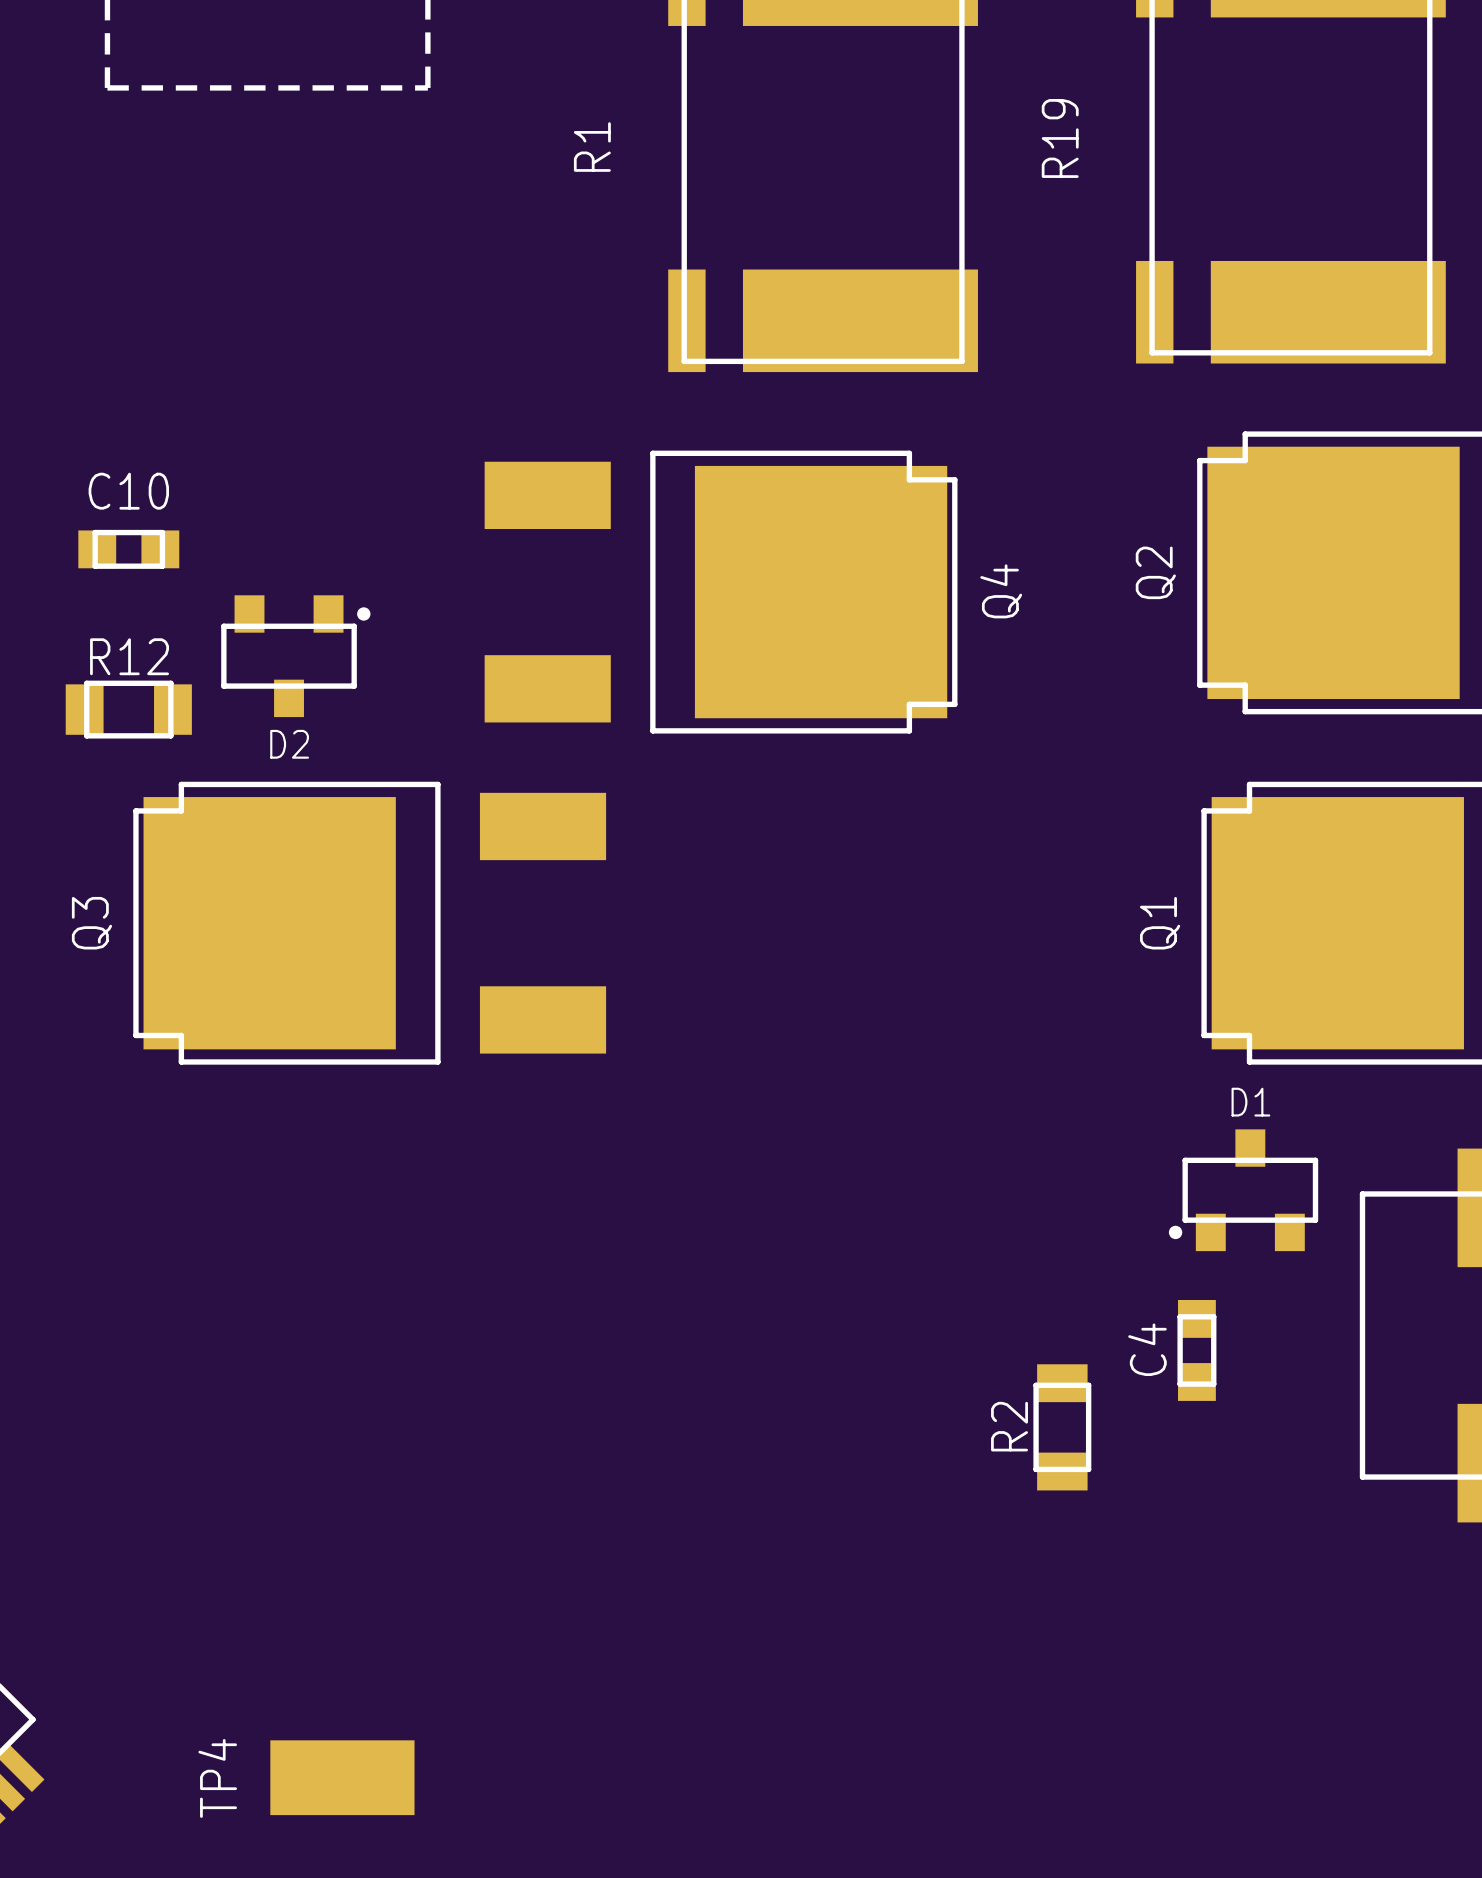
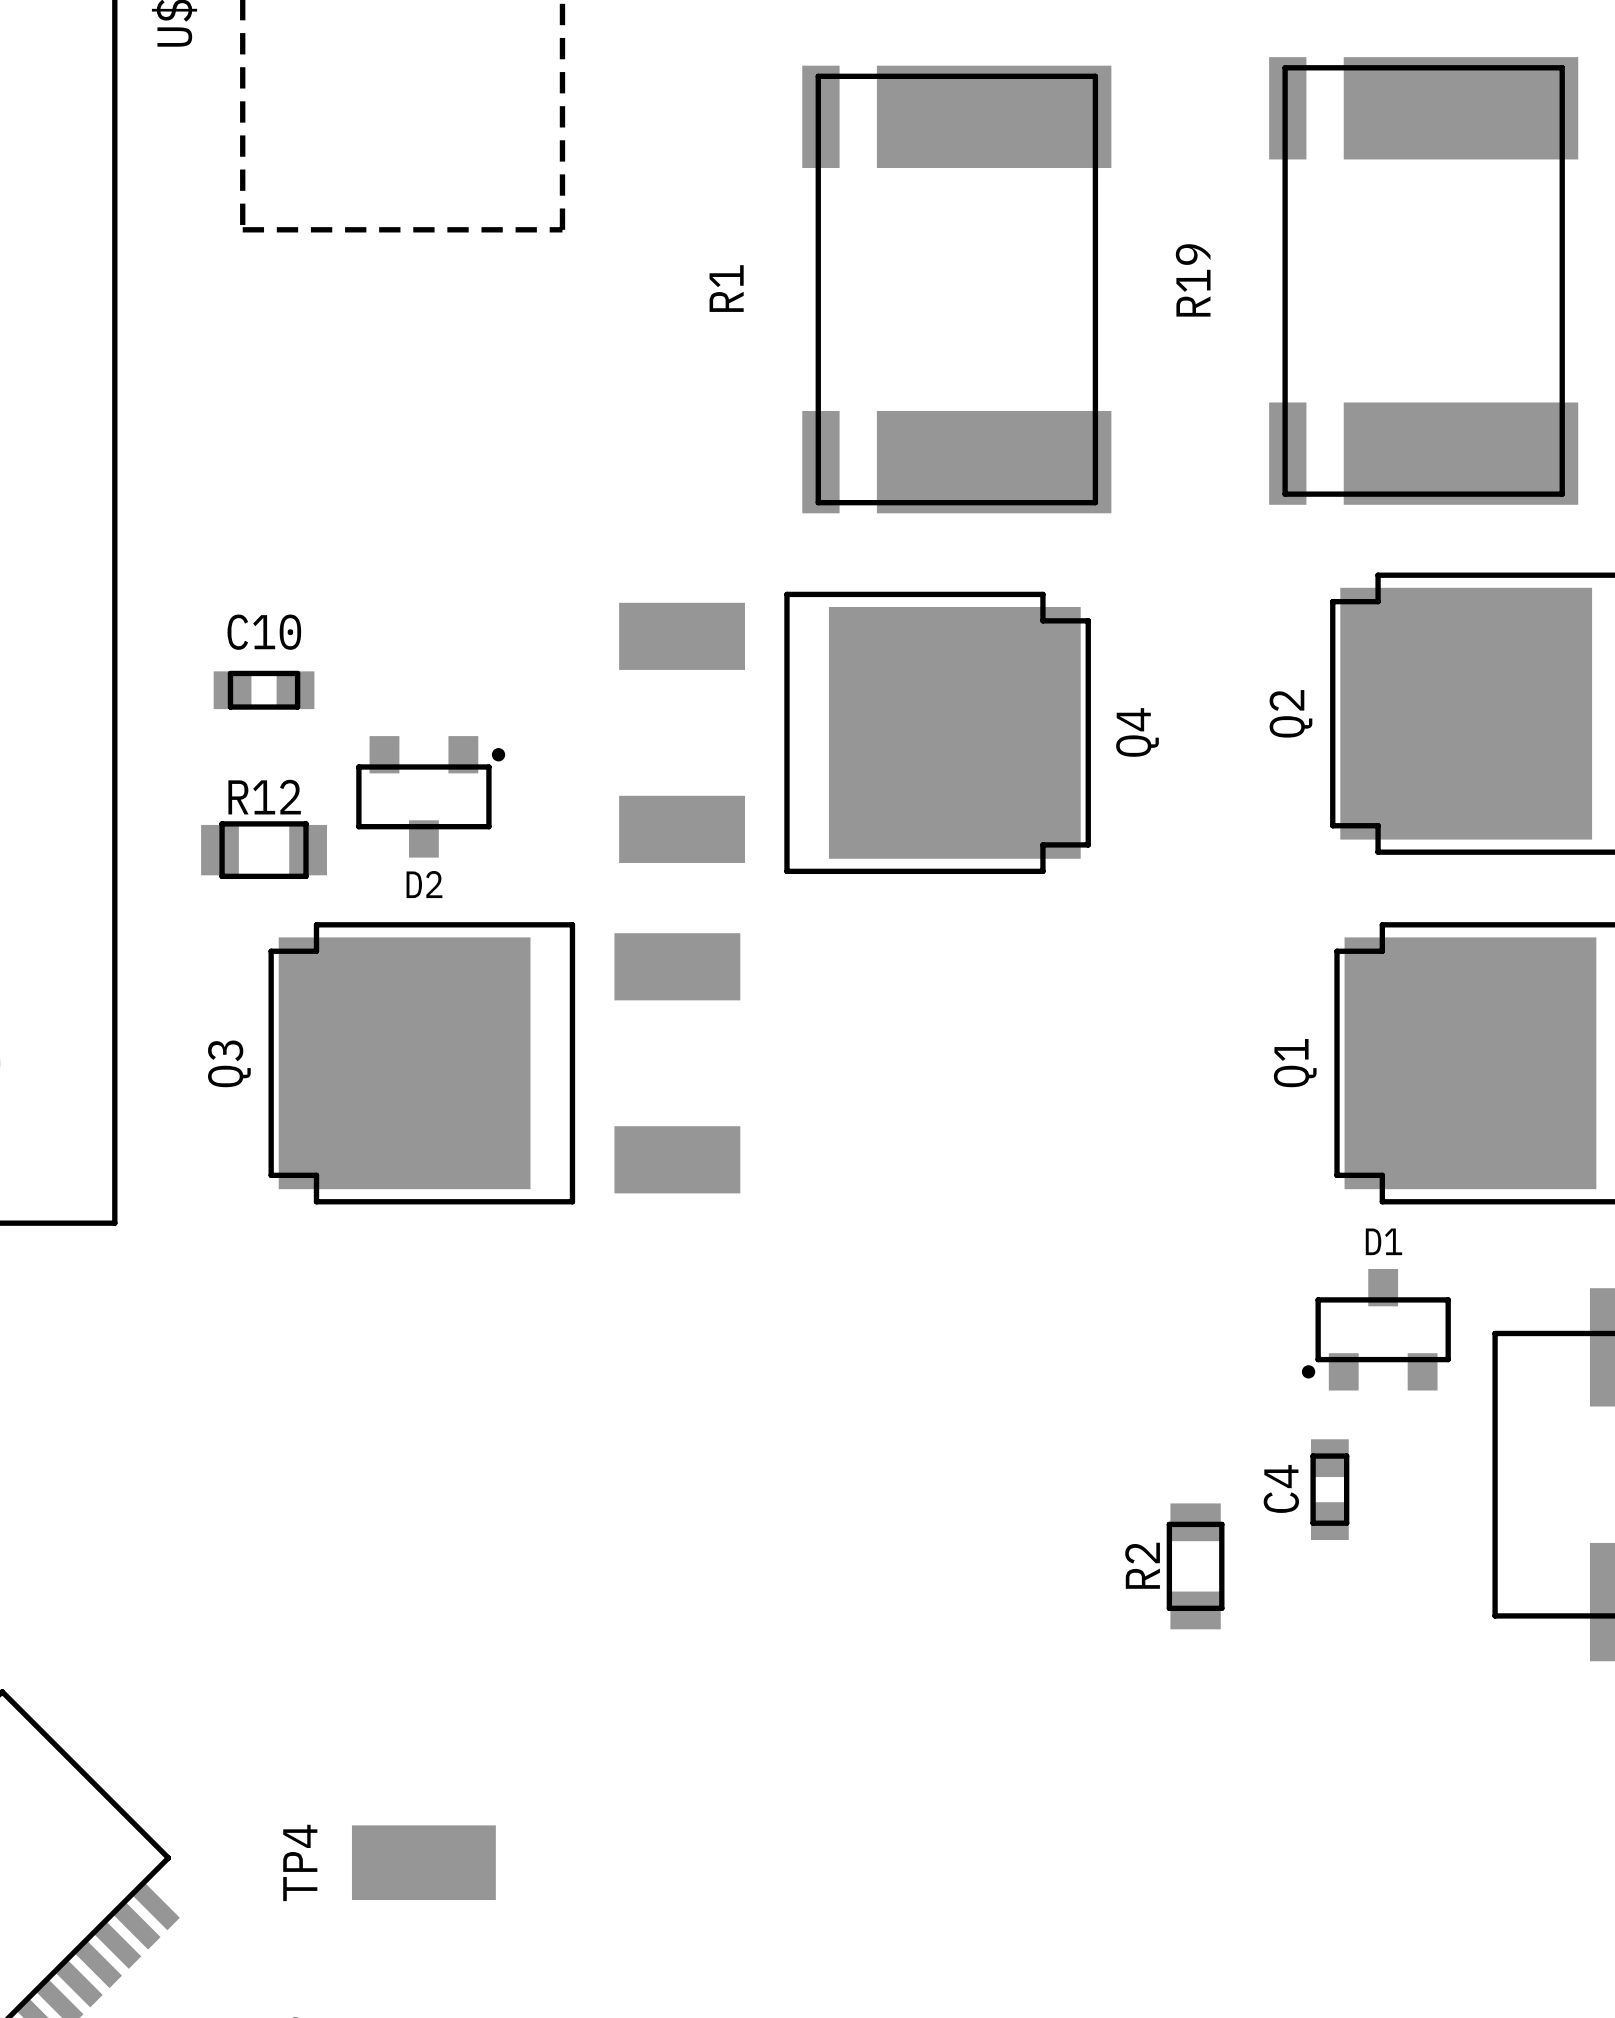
TP4 position: (342, 1777) -> (423, 1862)

